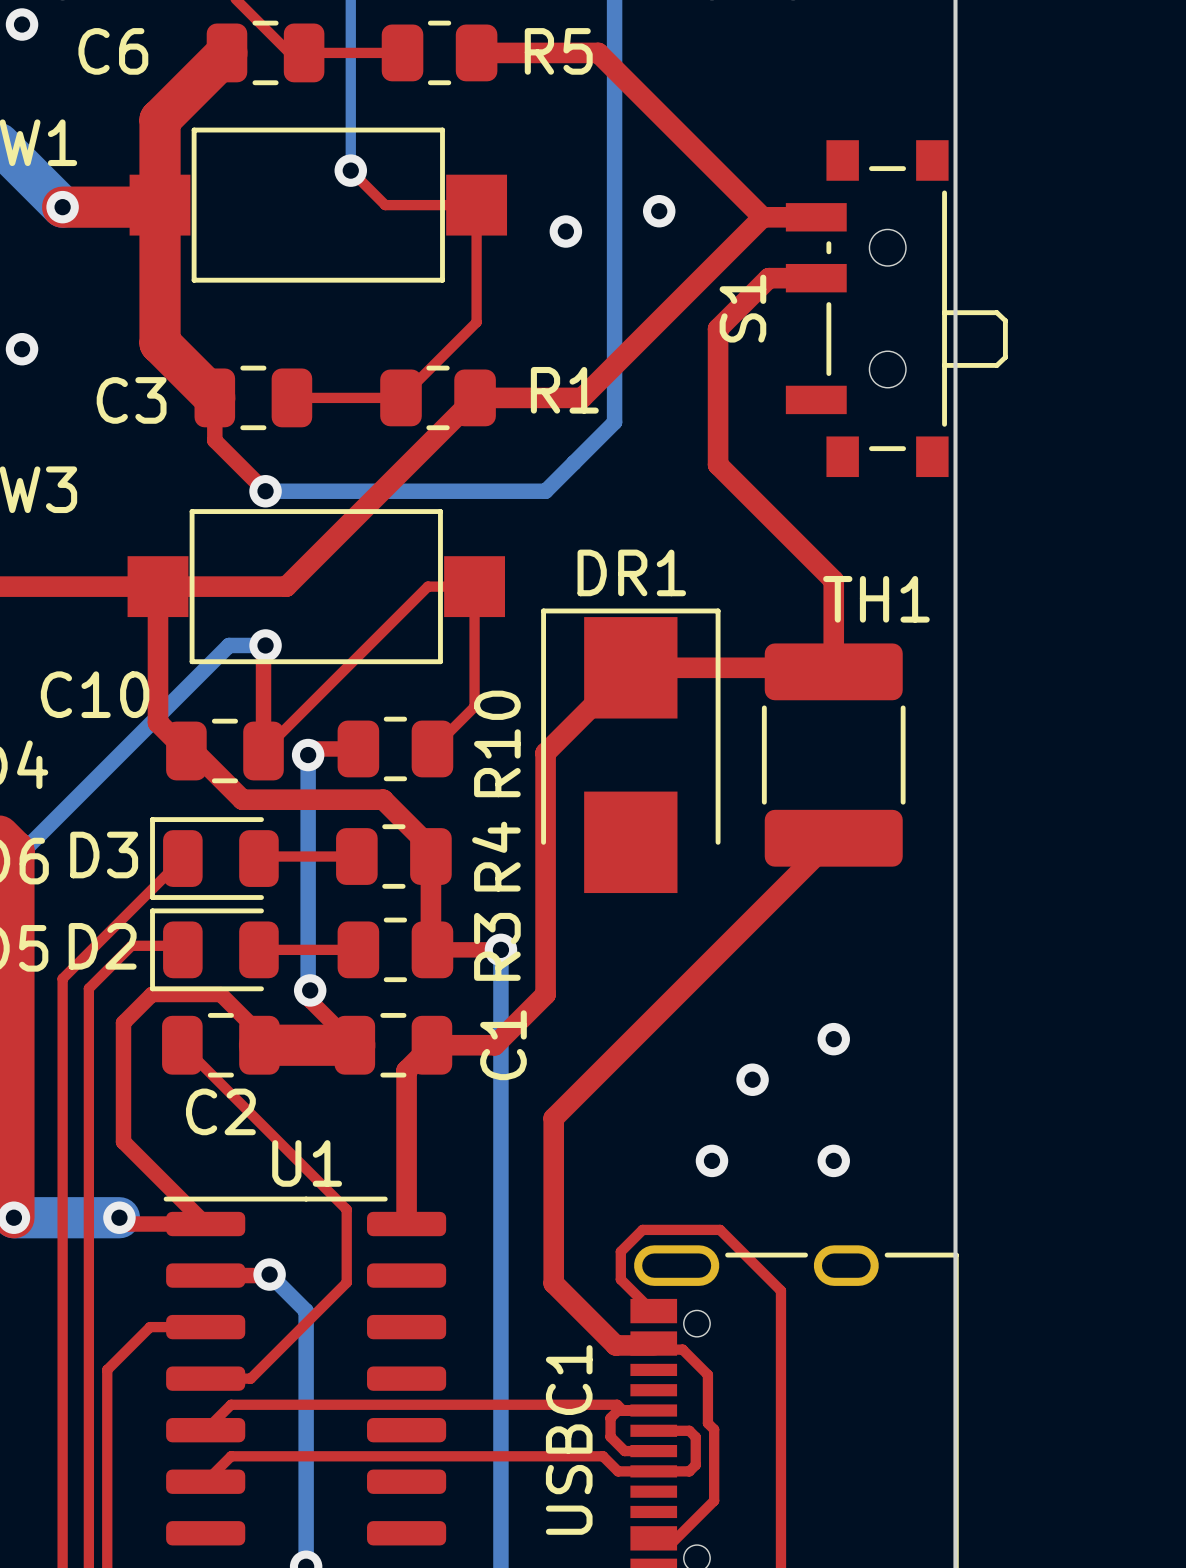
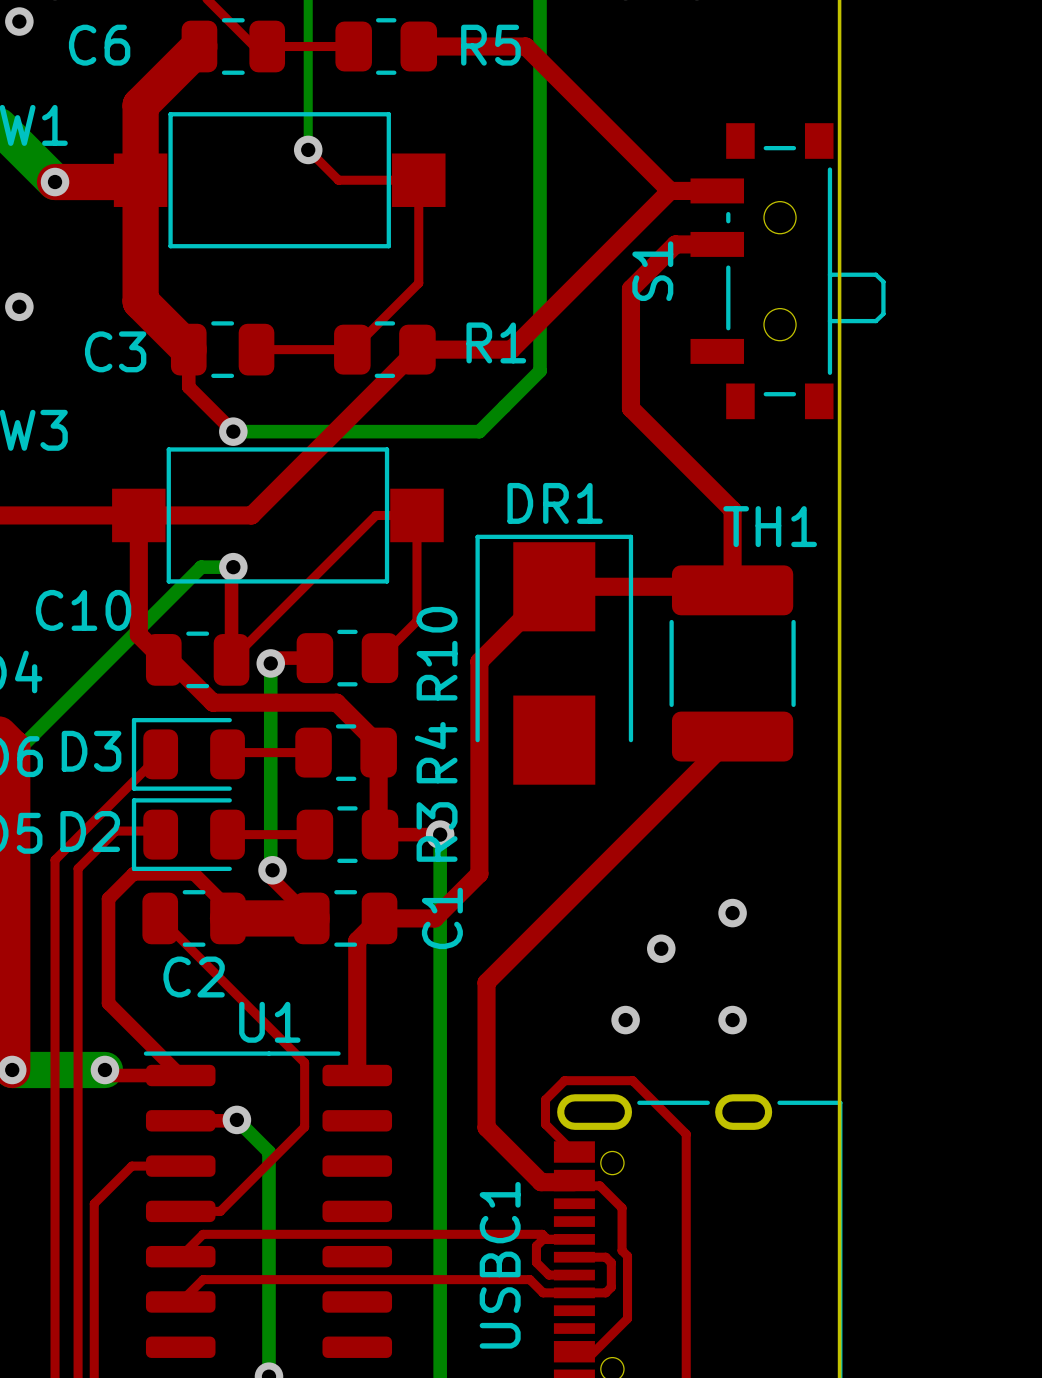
via: (659, 211) -> none
via: (565, 231) -> none

